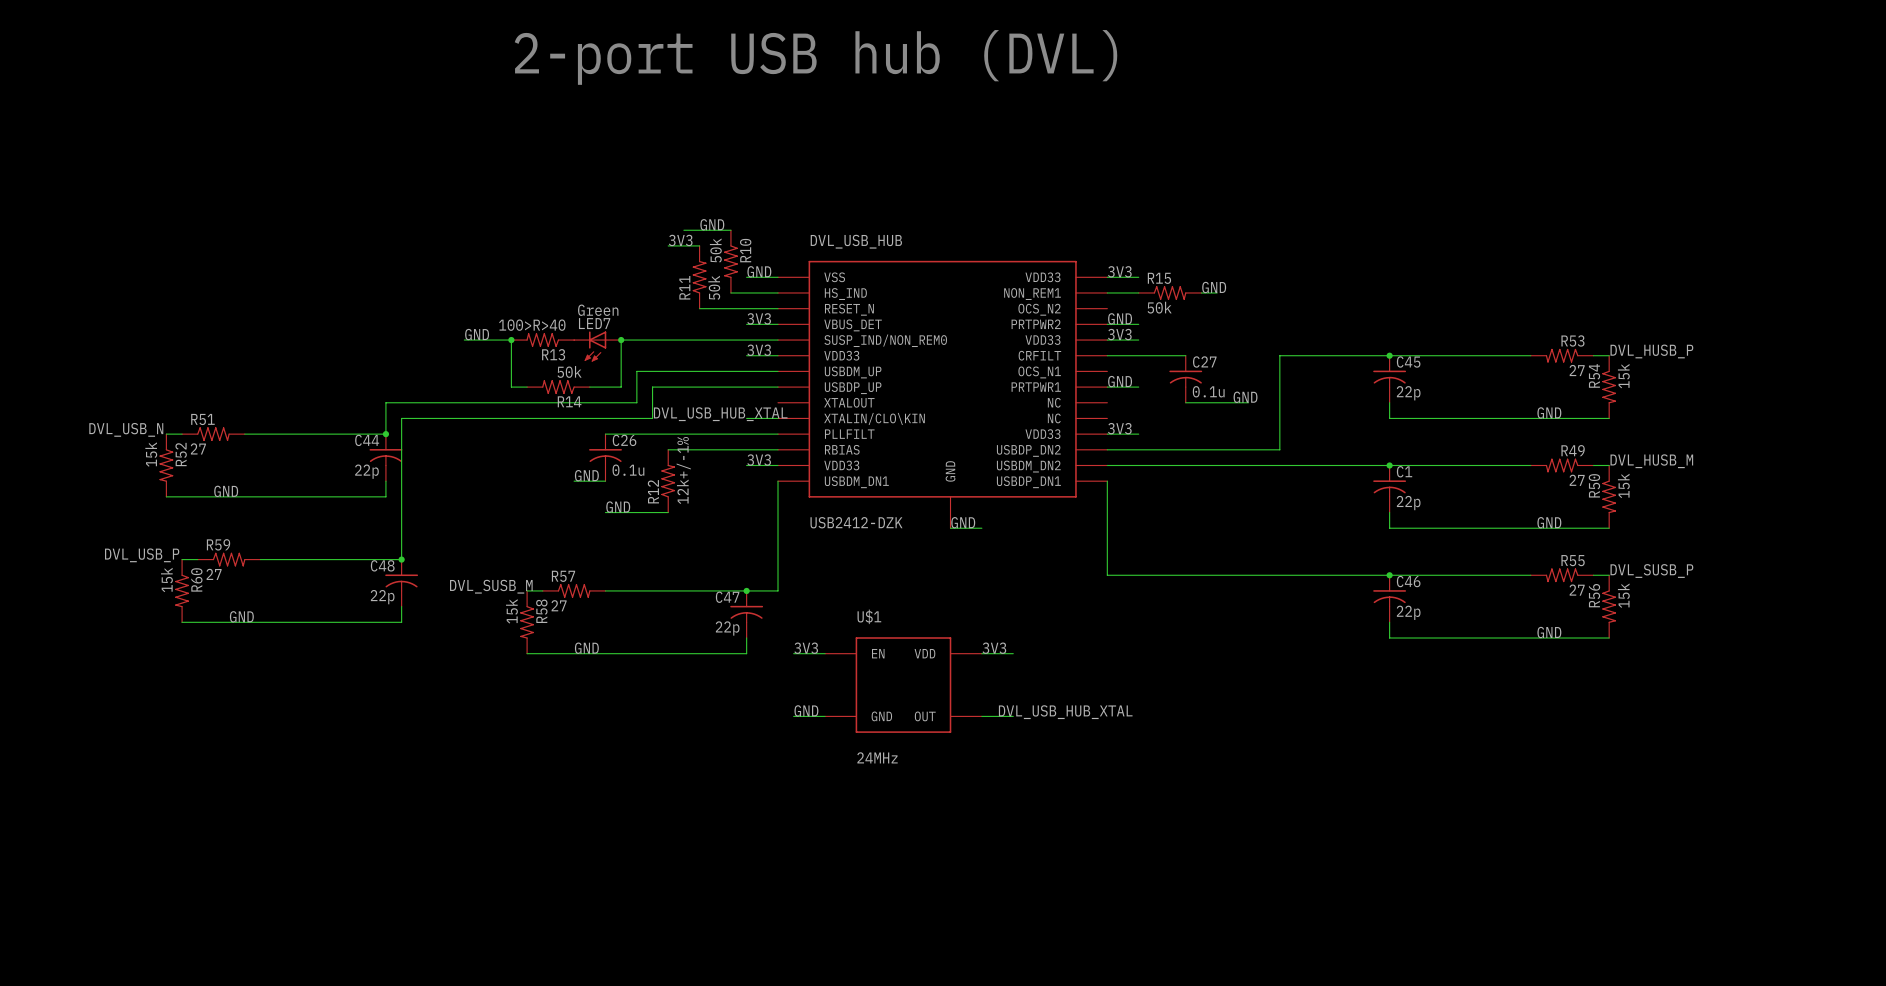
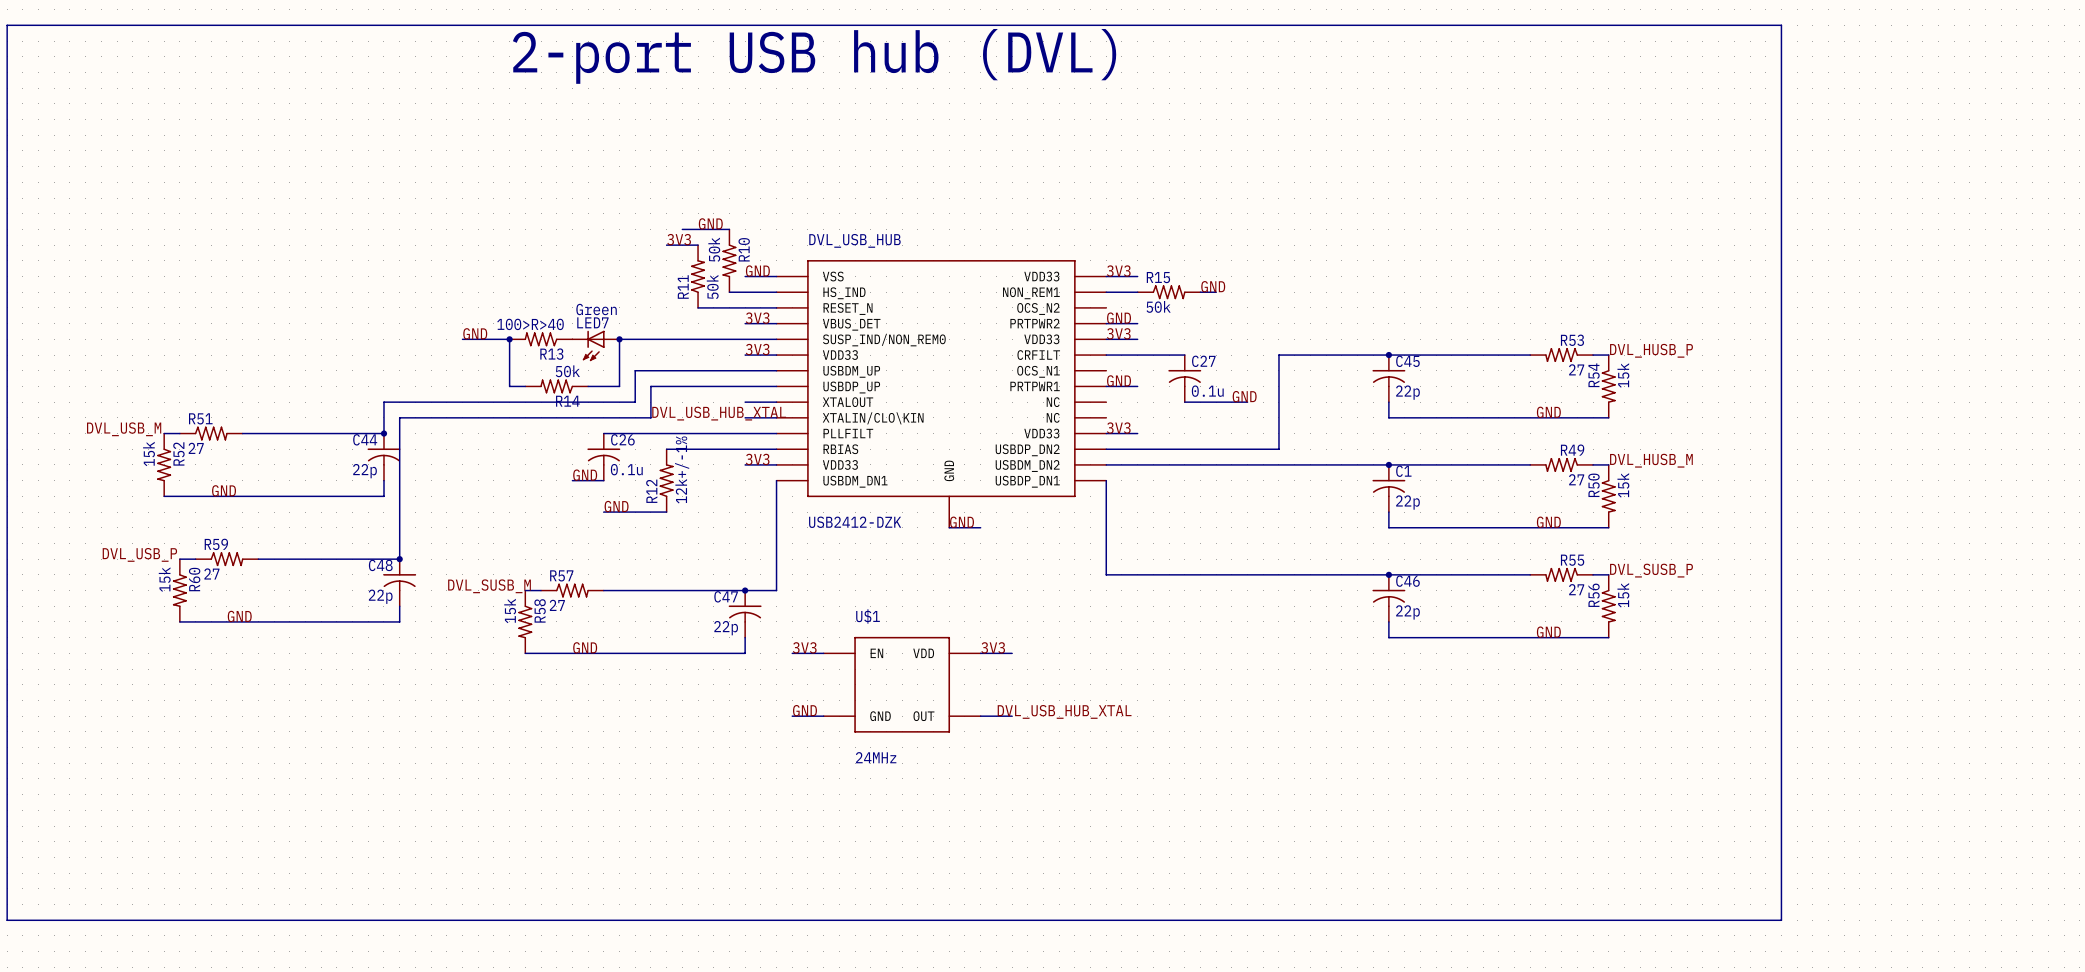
wire: none -> (7, 25) (1781, 25) (1781, 920) (7, 920) (7, 25)
wire: none -> (745, 402) (776, 402)
label: DVL_USB_N (126, 429) -> DVL_USB_M (124, 429)

